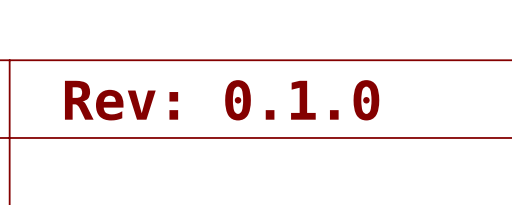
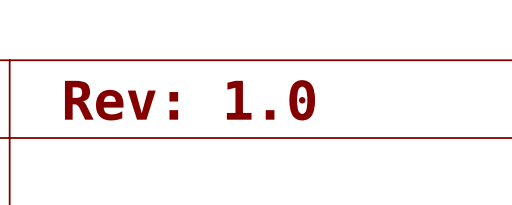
title block: Rev: 0.1.0 (222, 100) -> Rev: 1.0 (190, 100)

